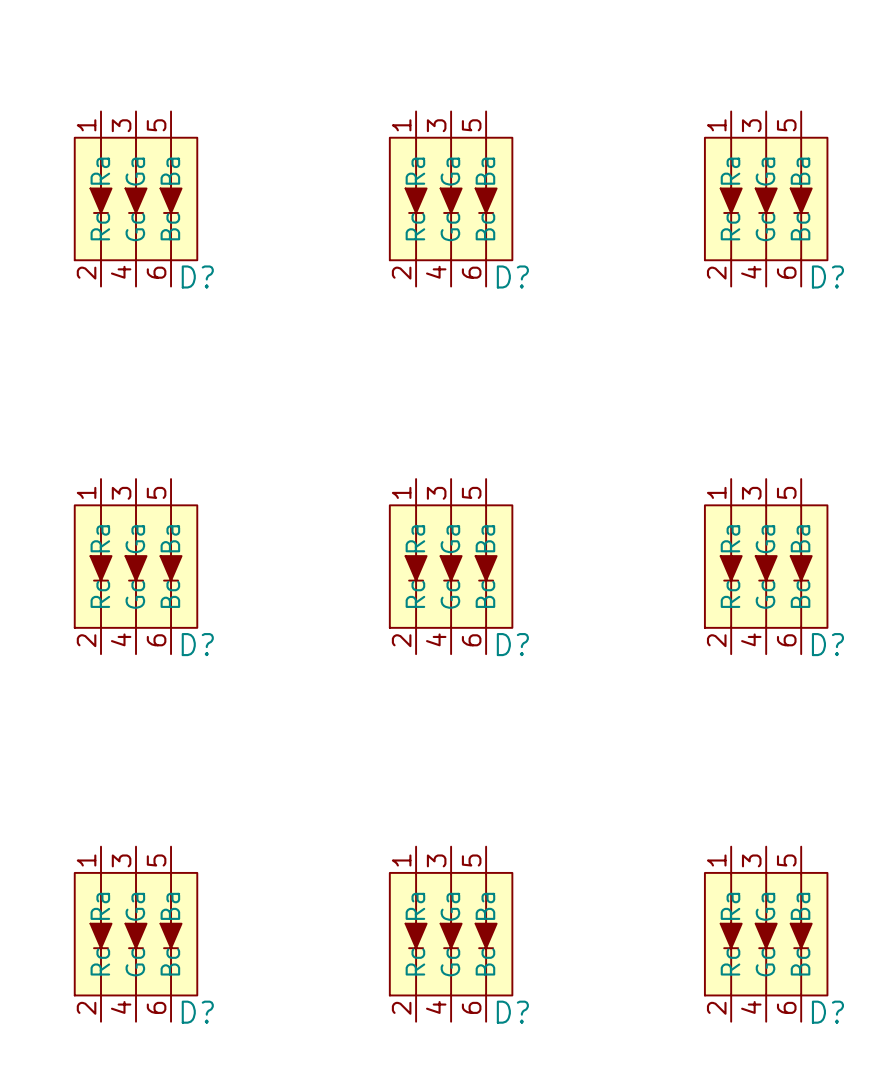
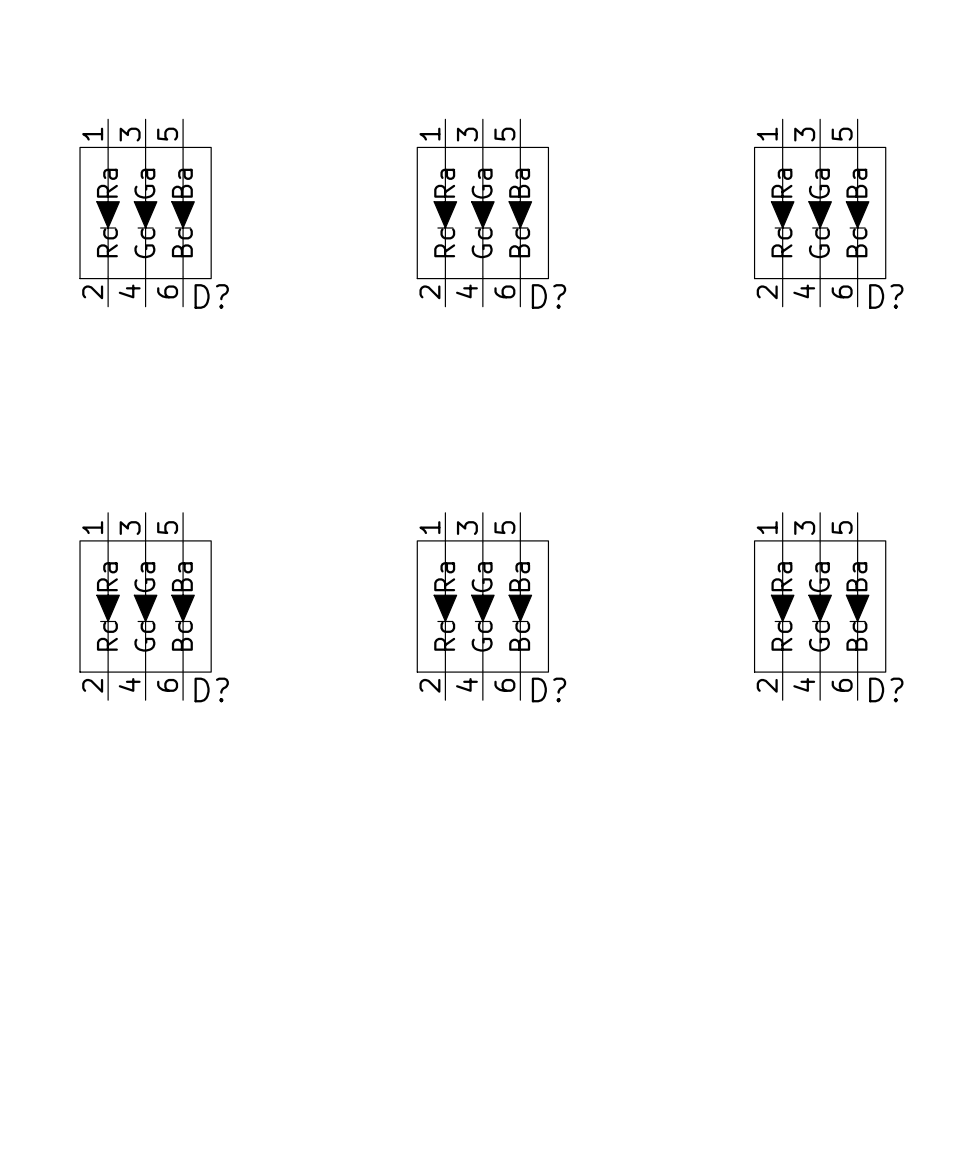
D?: (136, 934) -> none
D?: (451, 934) -> none
D?: (766, 934) -> none

